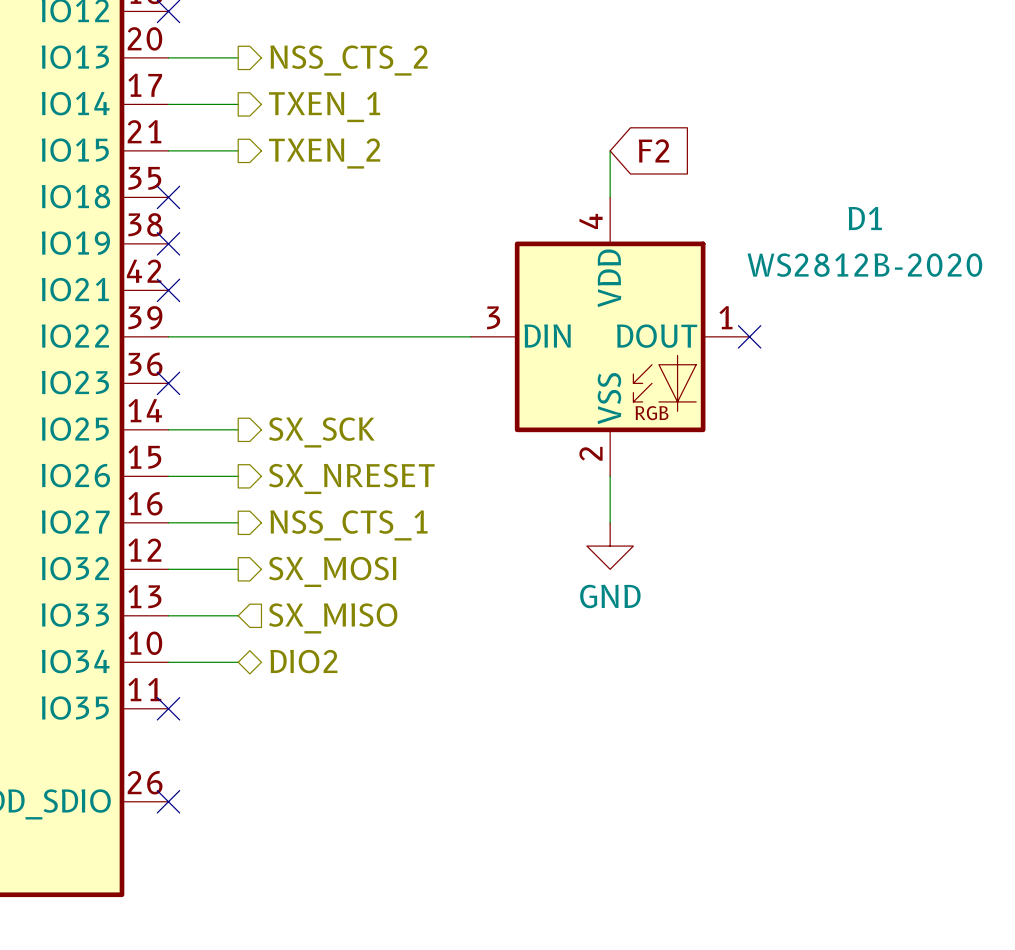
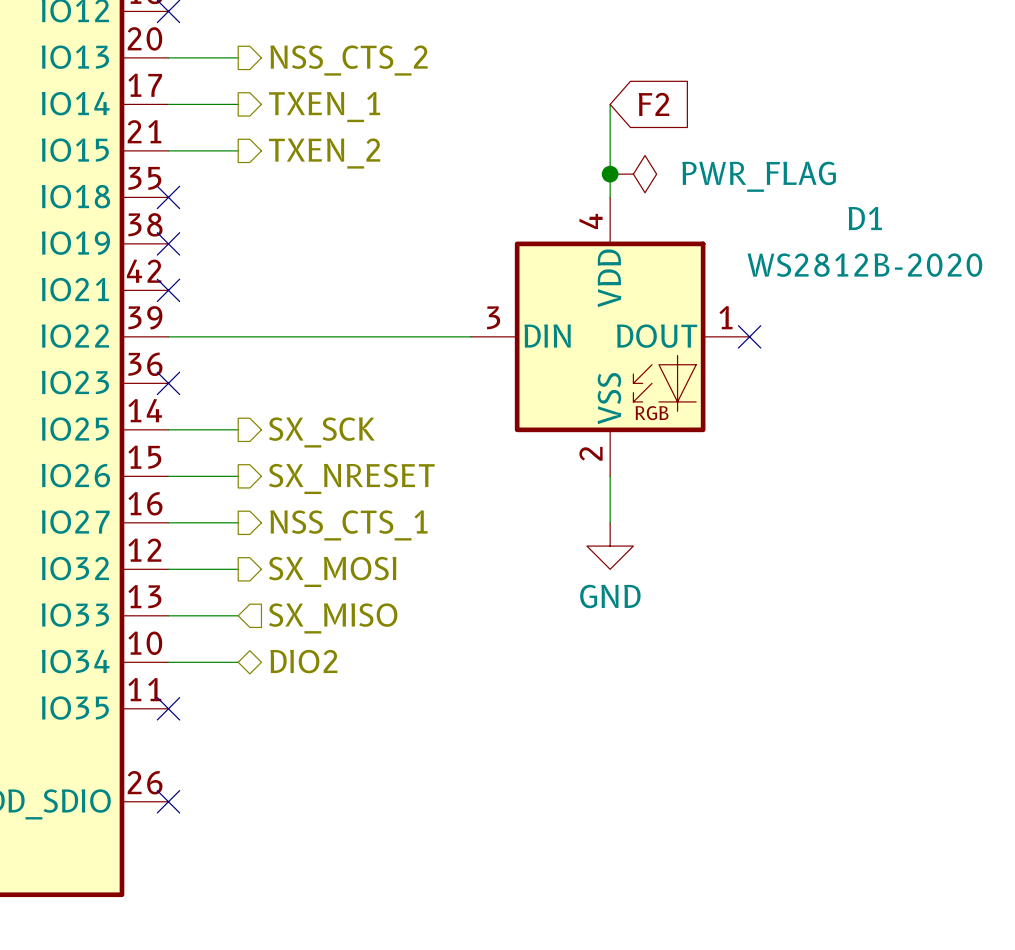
wire: none -> (610, 104) (610, 150)
global label position: F2 (654, 150) -> F2 (654, 104)
junction: none -> (610, 174)
power symbol: none -> PWR_FLAG (633, 174)

